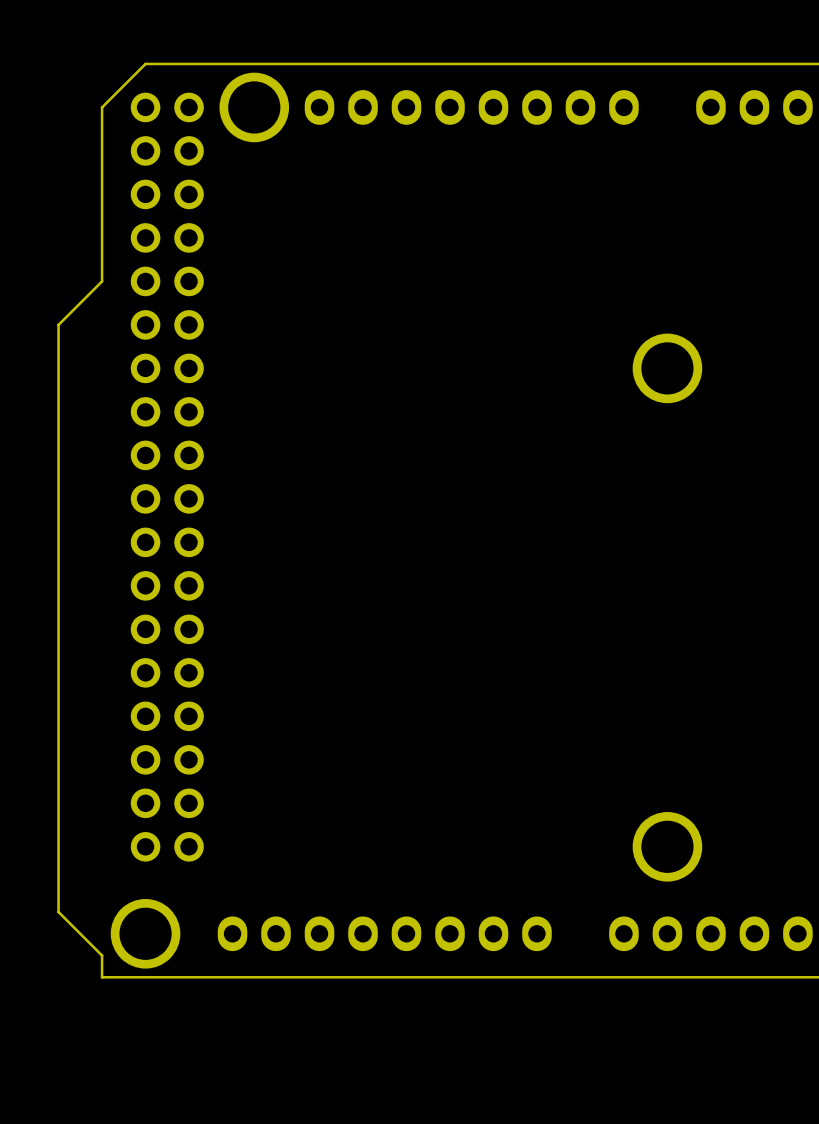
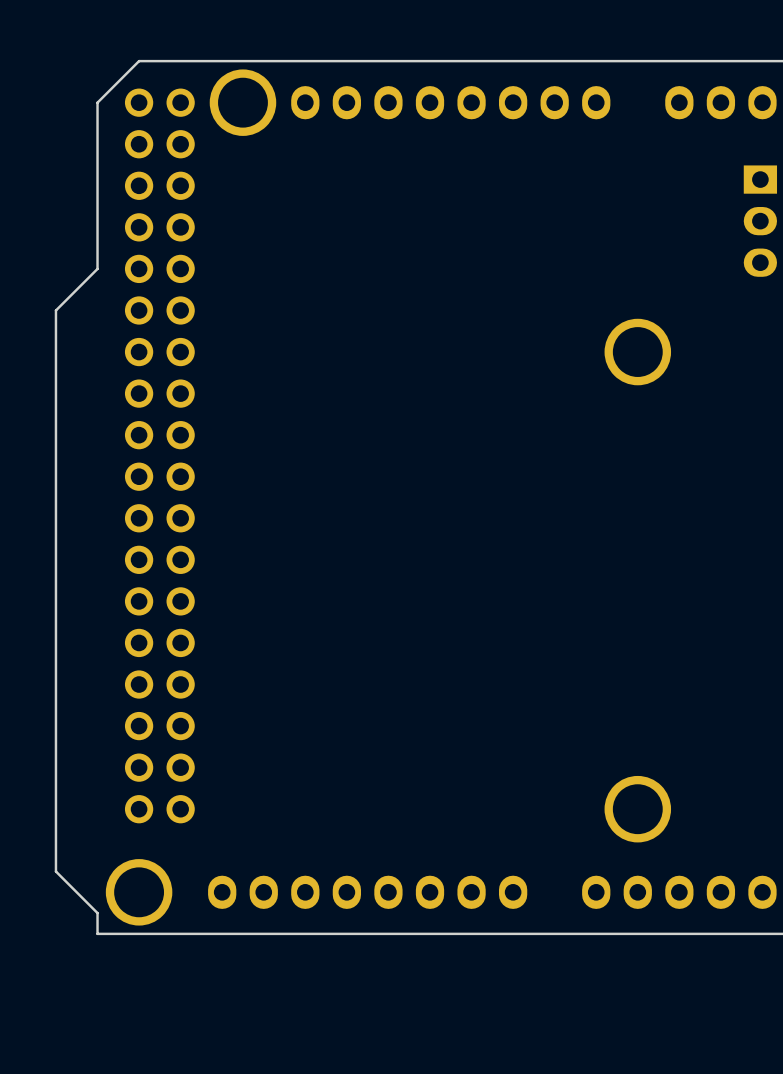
part: none -> (760, 221)

